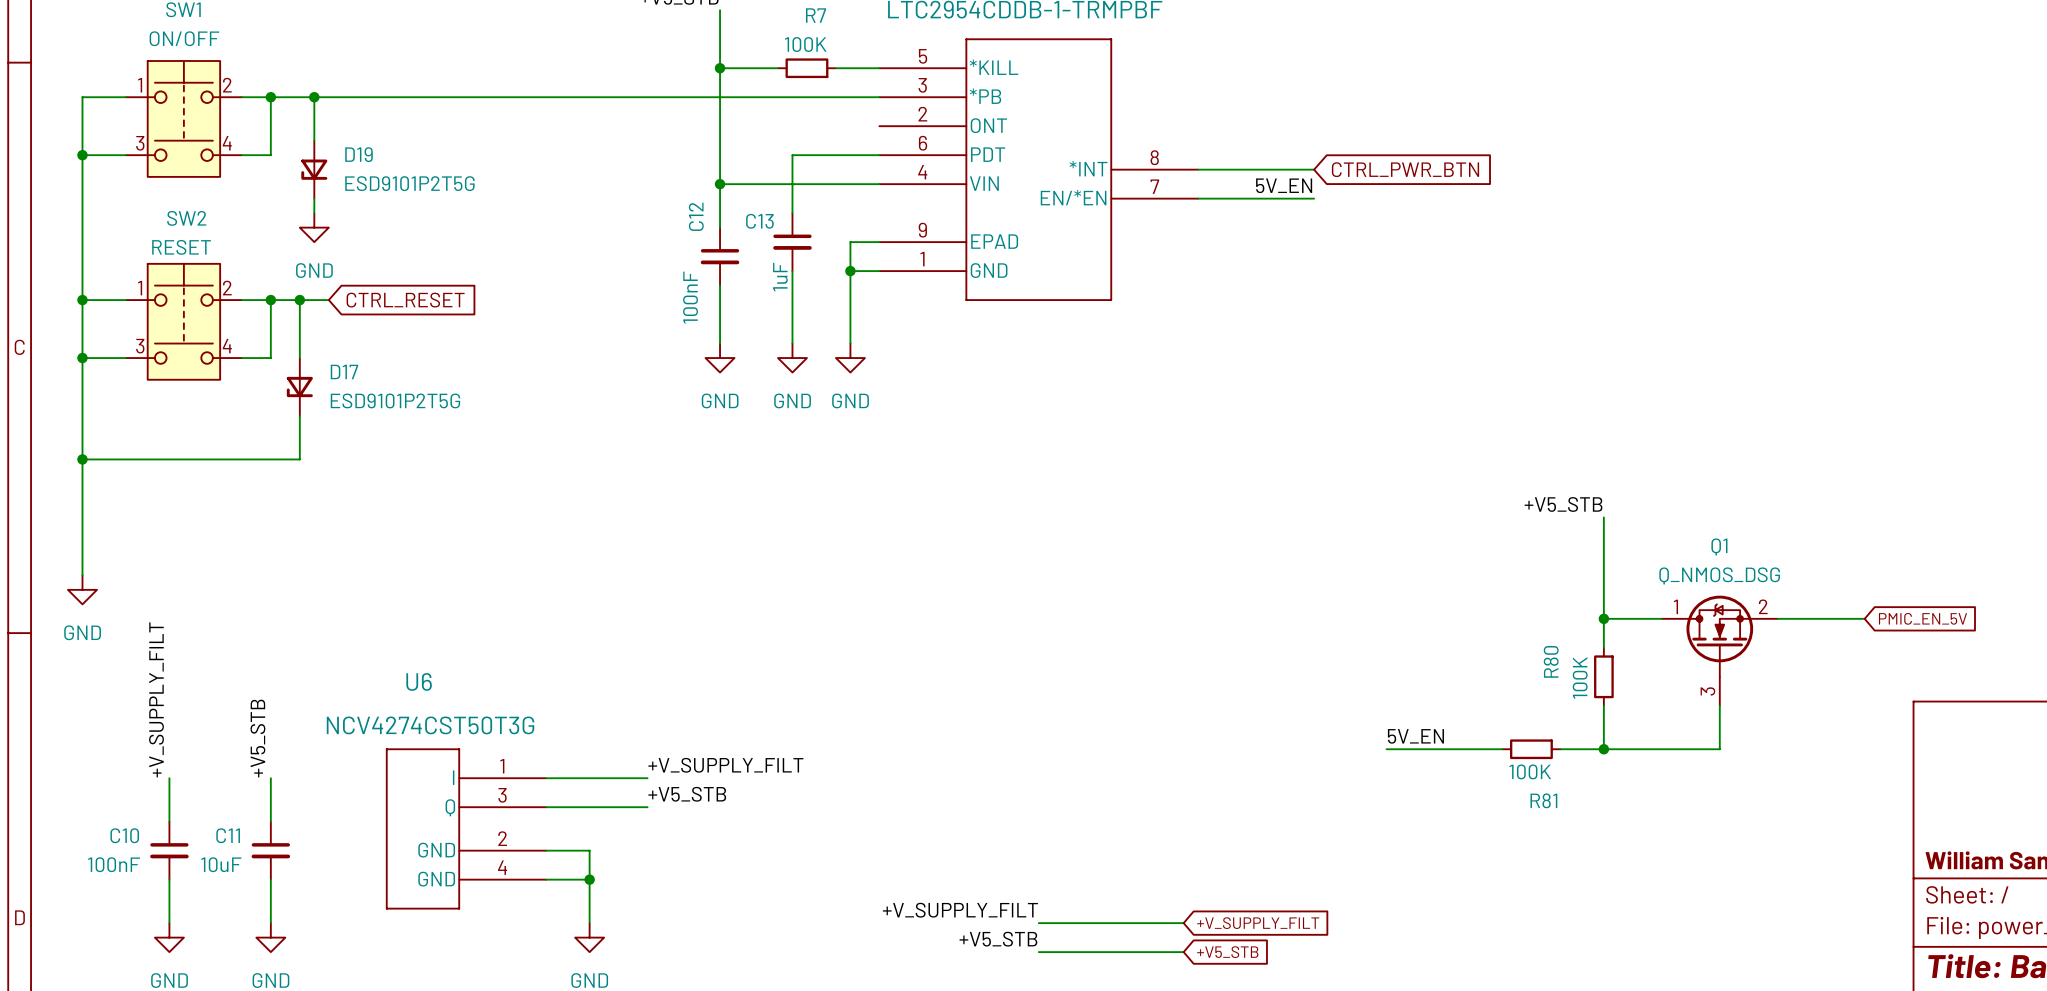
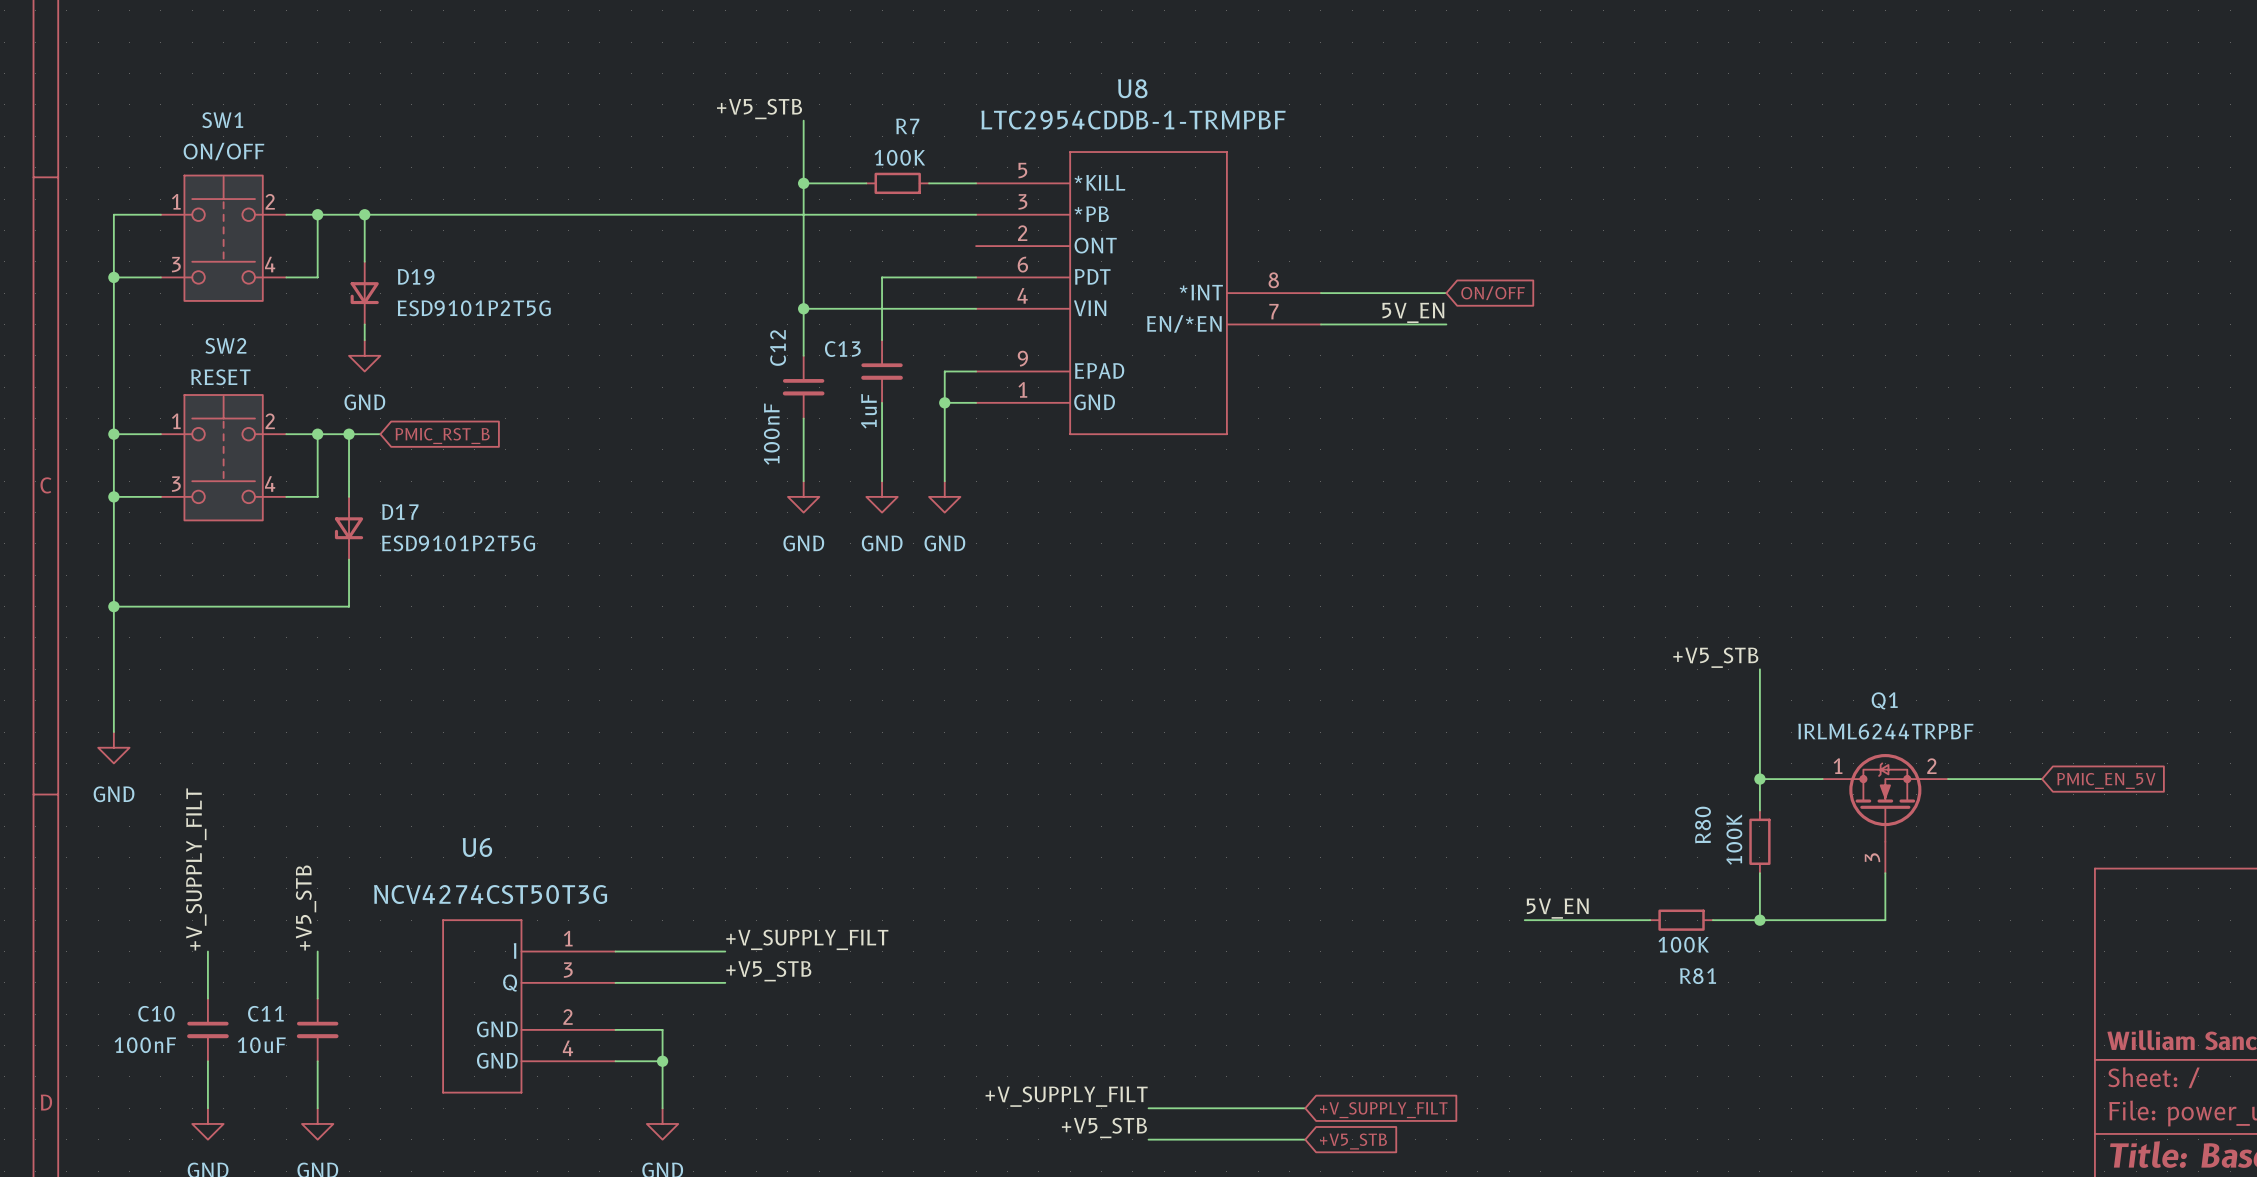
global label: CTRL_PWR_BTN (1405, 169) -> ON/OFF (1493, 293)
global label: CTRL_RESET (405, 300) -> PMIC_RST_B (442, 436)
Q1 value: Q_NMOS_DSG (1719, 575) -> IRLML6244TRPBF (1885, 731)

